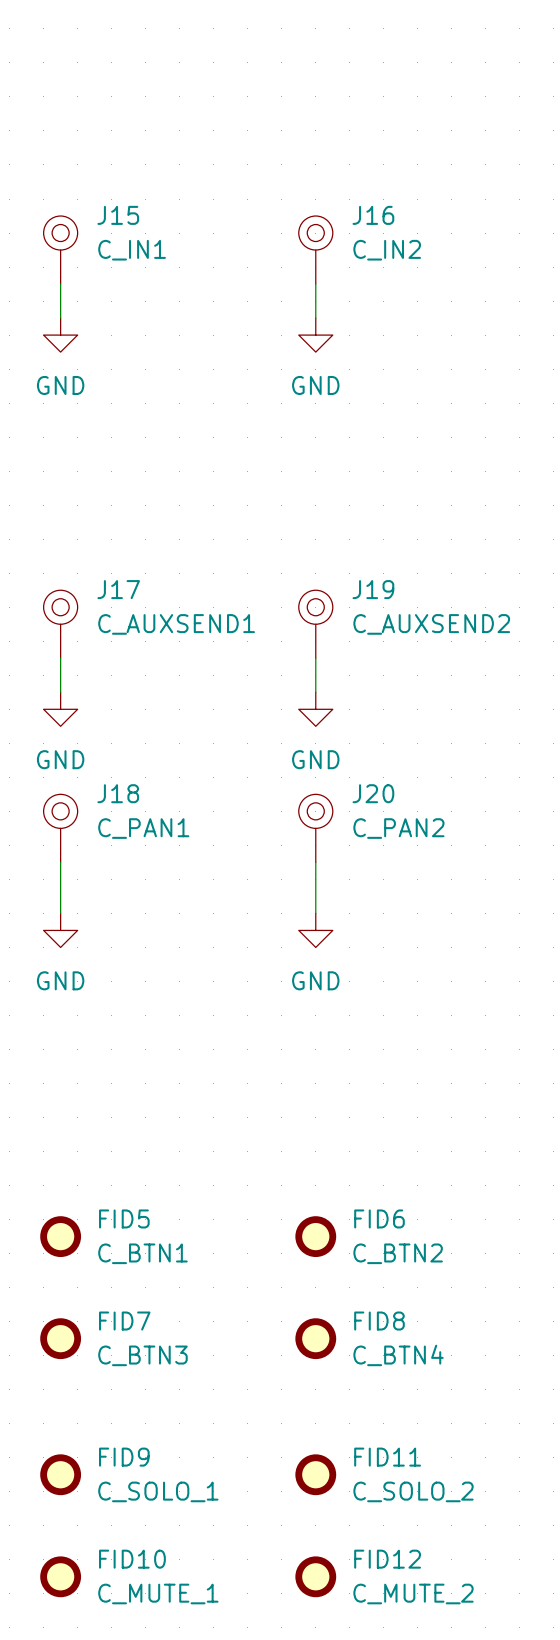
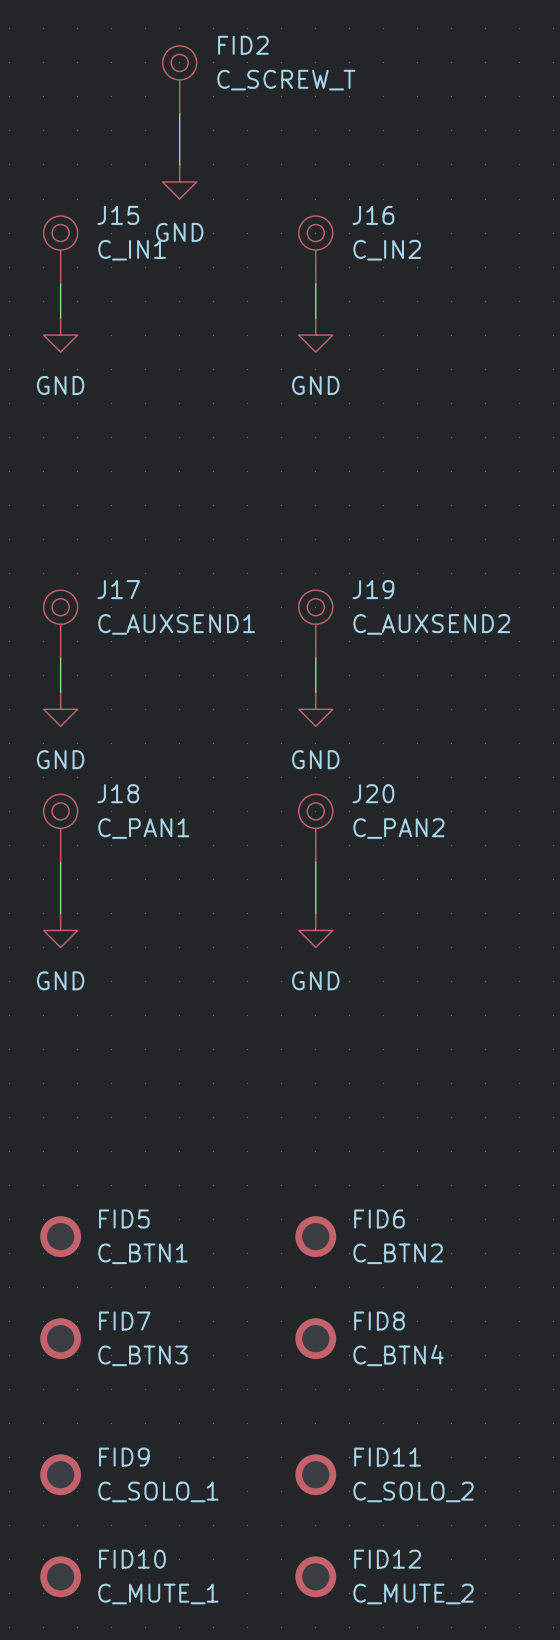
FID2: none -> C_SCREW_T (179, 79)
wire: none -> (179, 113) (179, 164)
power symbol: none -> GND (179, 181)

